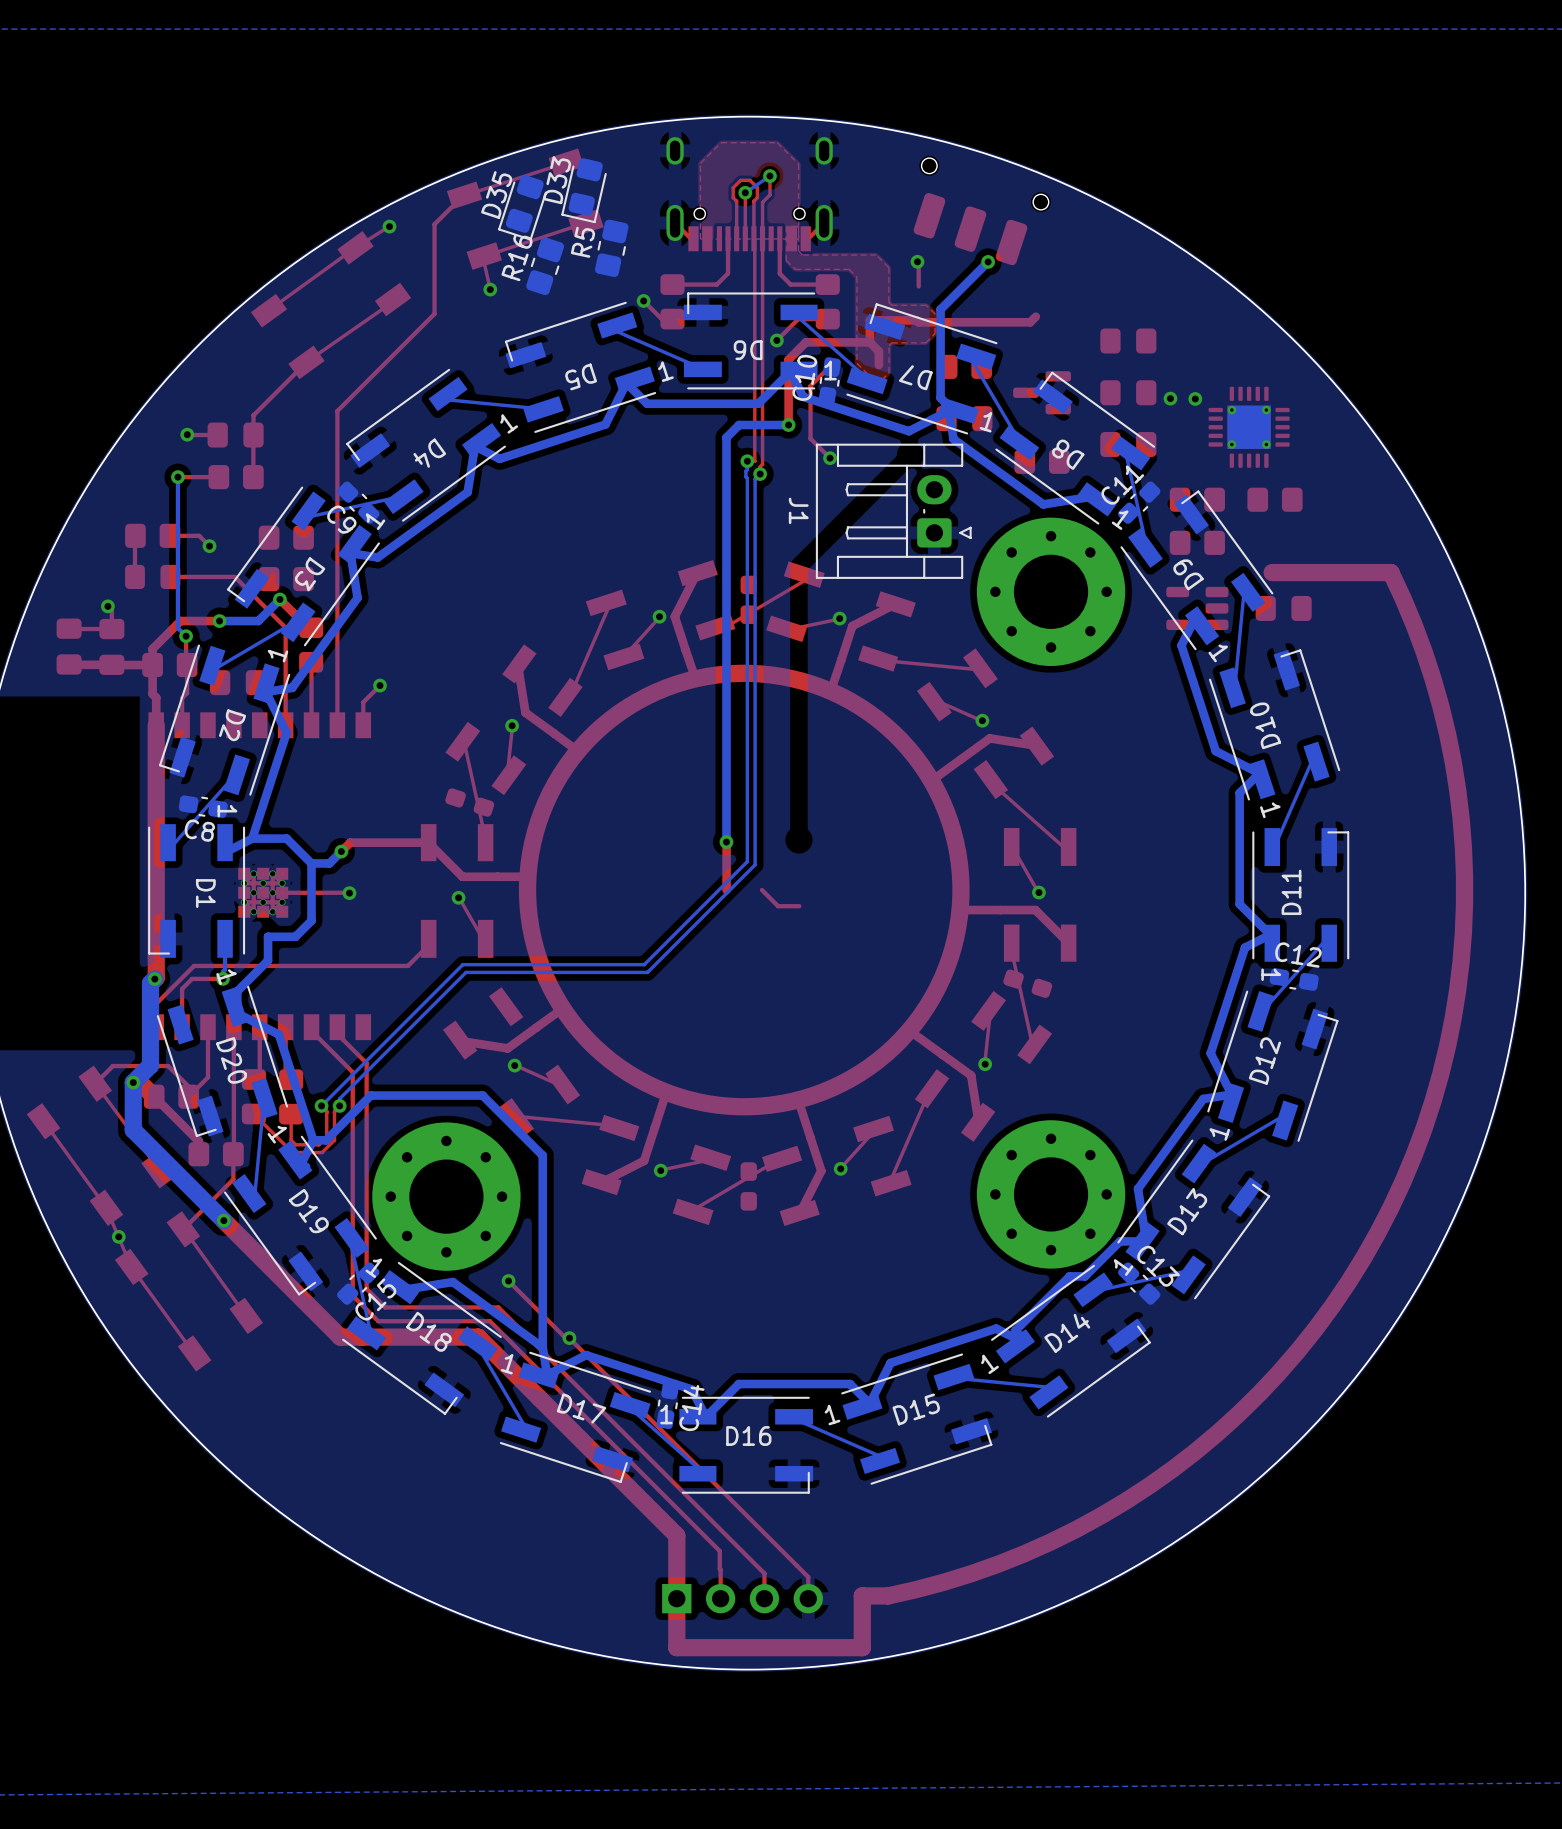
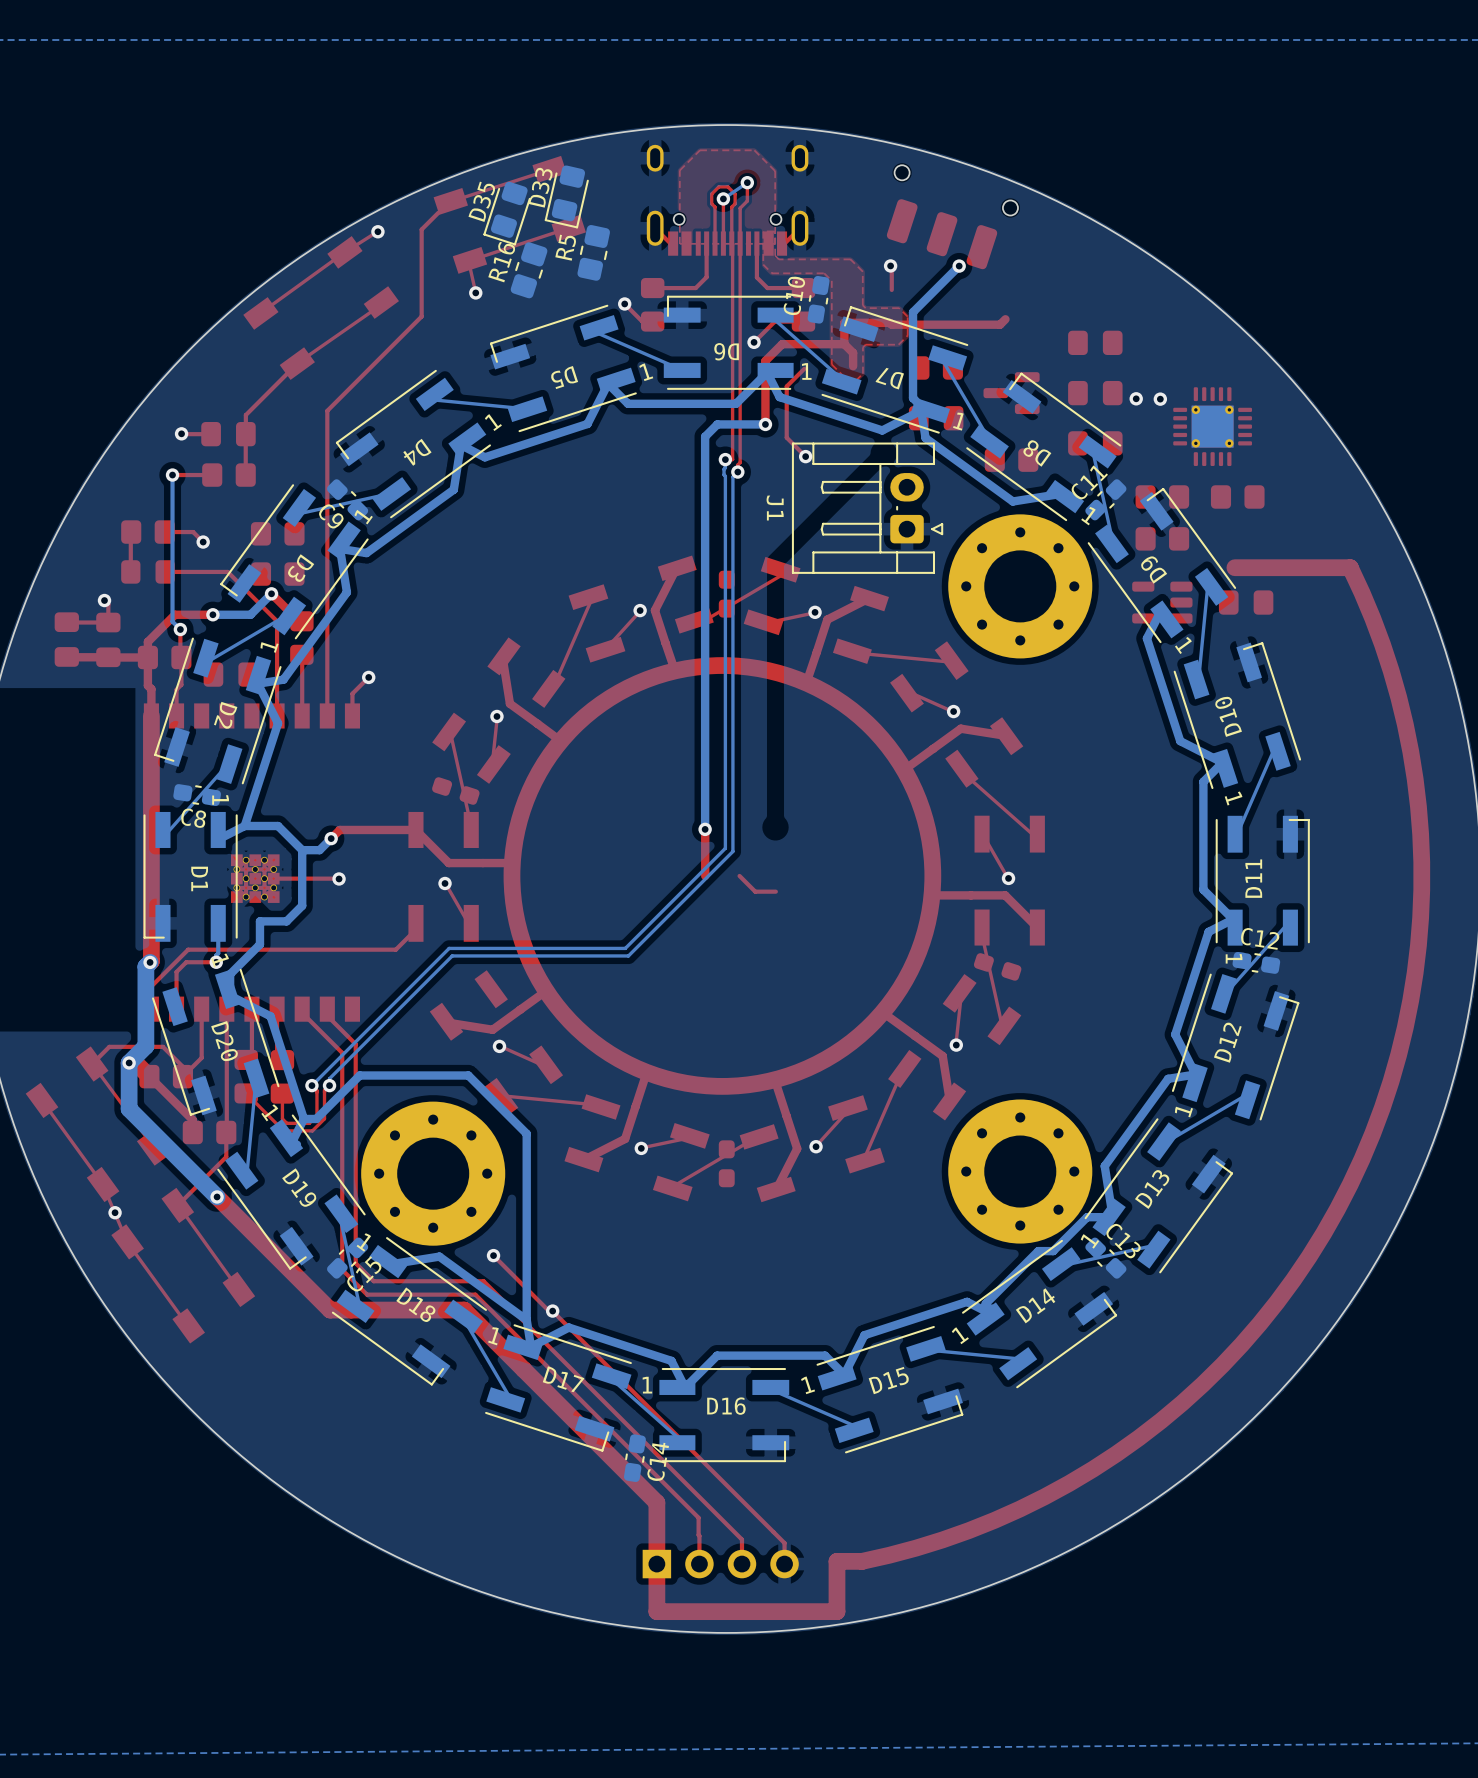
C10 position: (829, 381) -> (818, 299)
C14 position: (667, 1404) -> (634, 1458)

